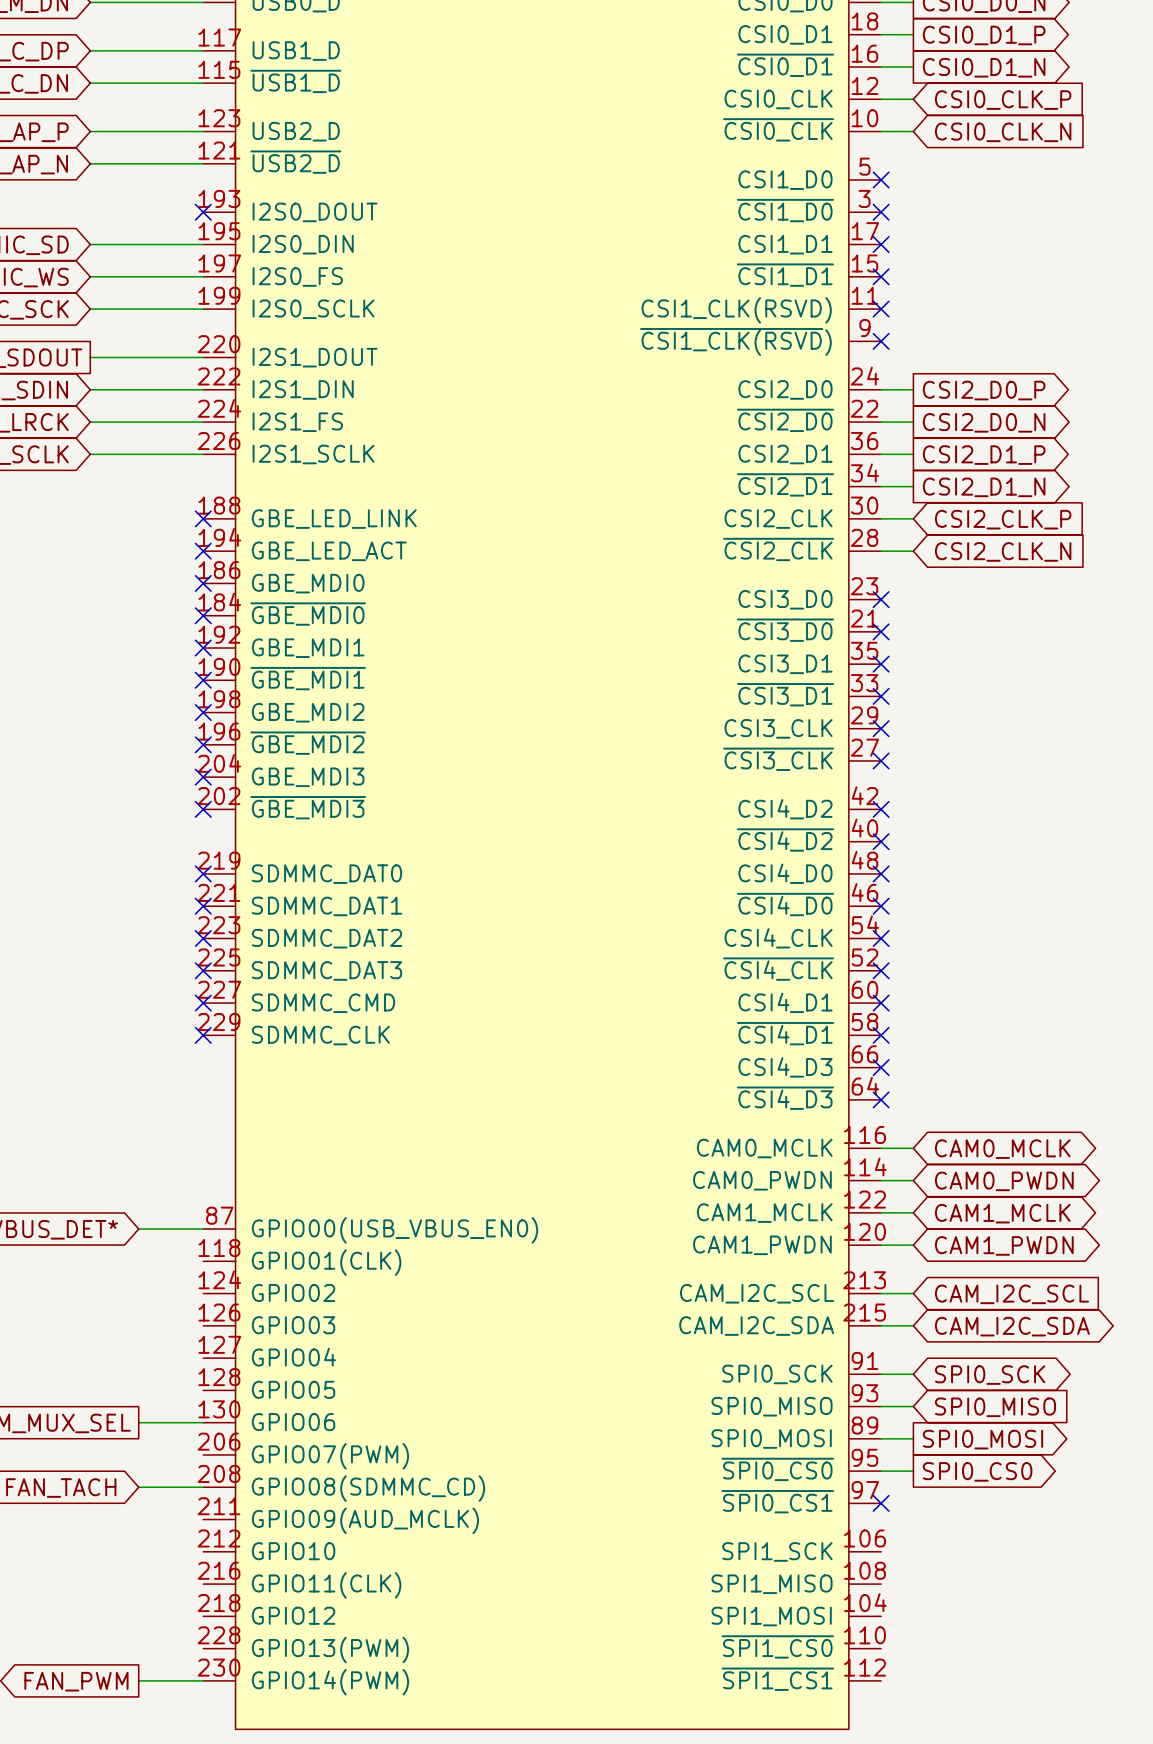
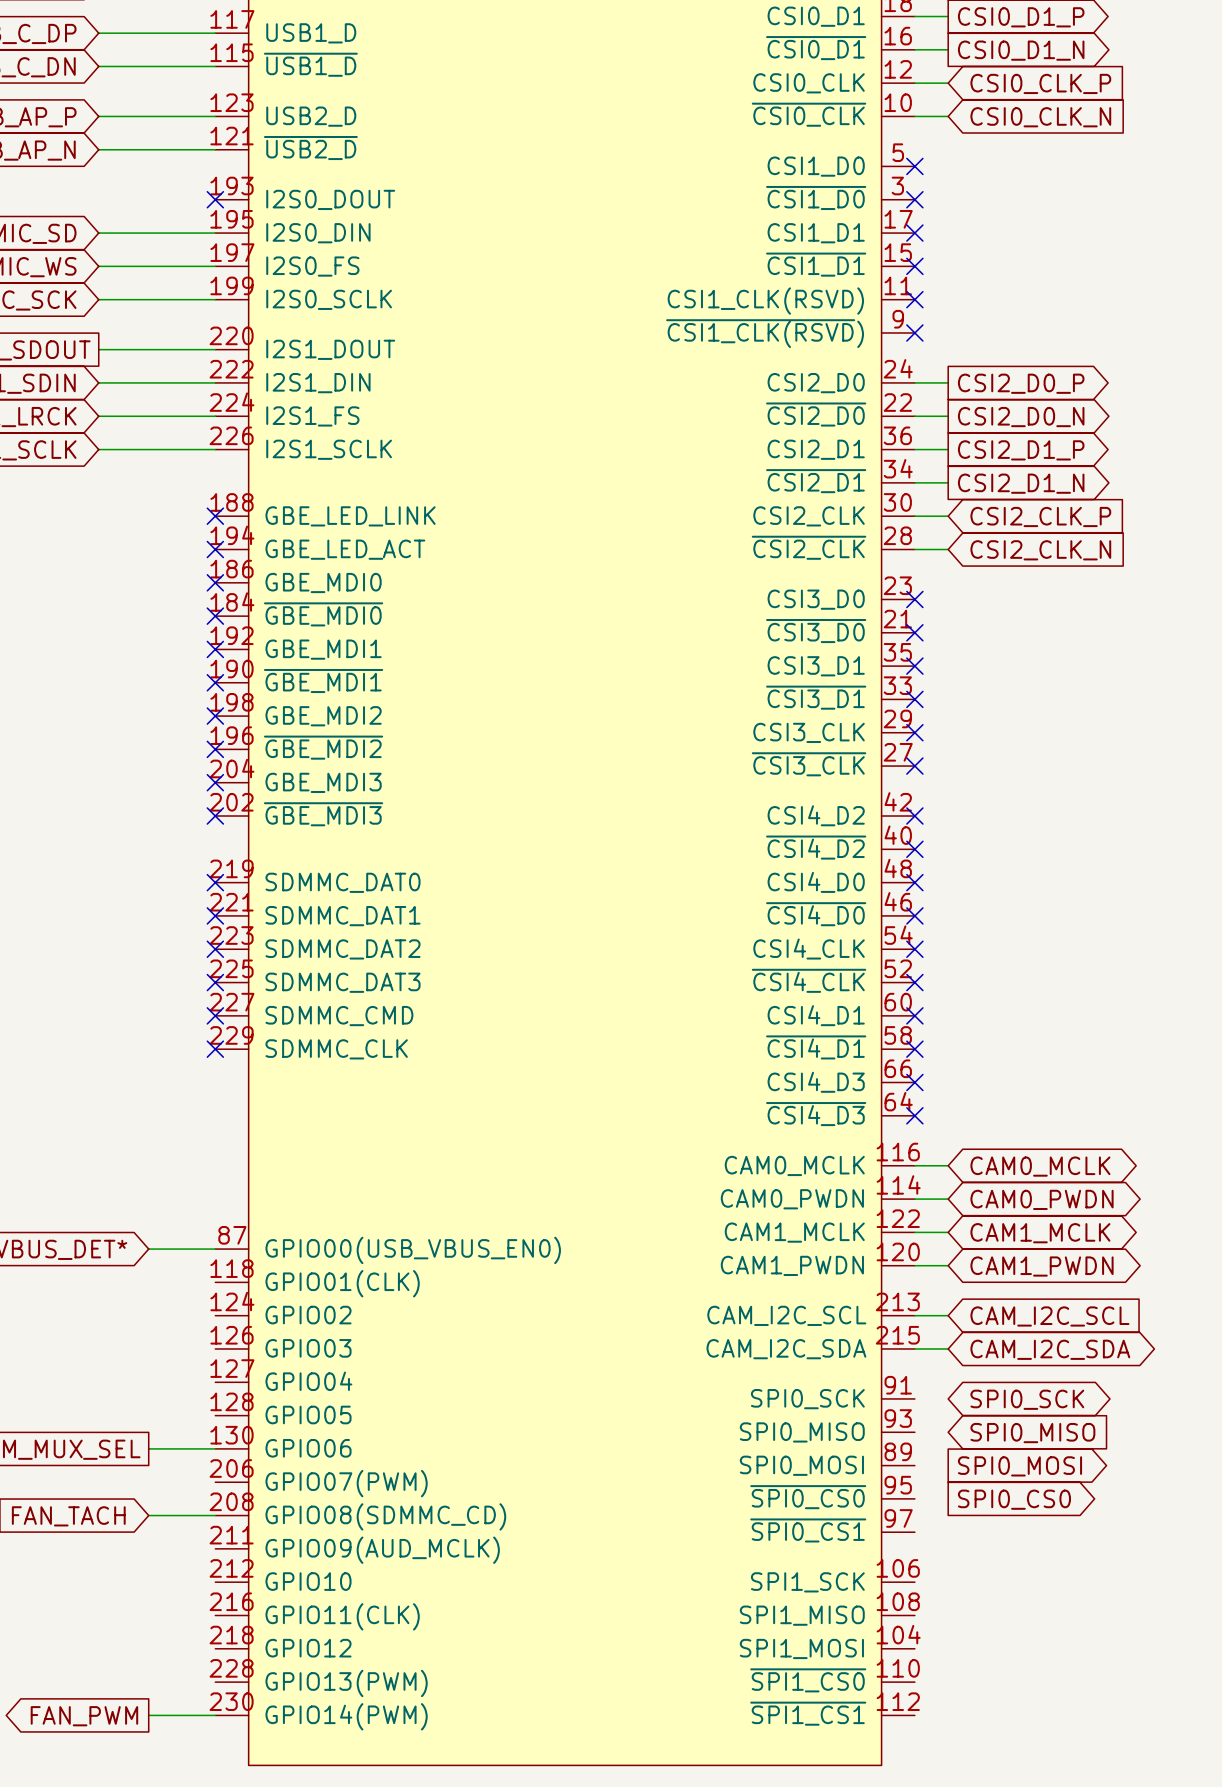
wire: (881, 1374) (913, 1374) -> none
wire: (881, 1406) (913, 1406) -> none
wire: (881, 1438) (913, 1438) -> none
wire: (881, 1471) (913, 1471) -> none
no-connect mark: (881, 1503) -> none

